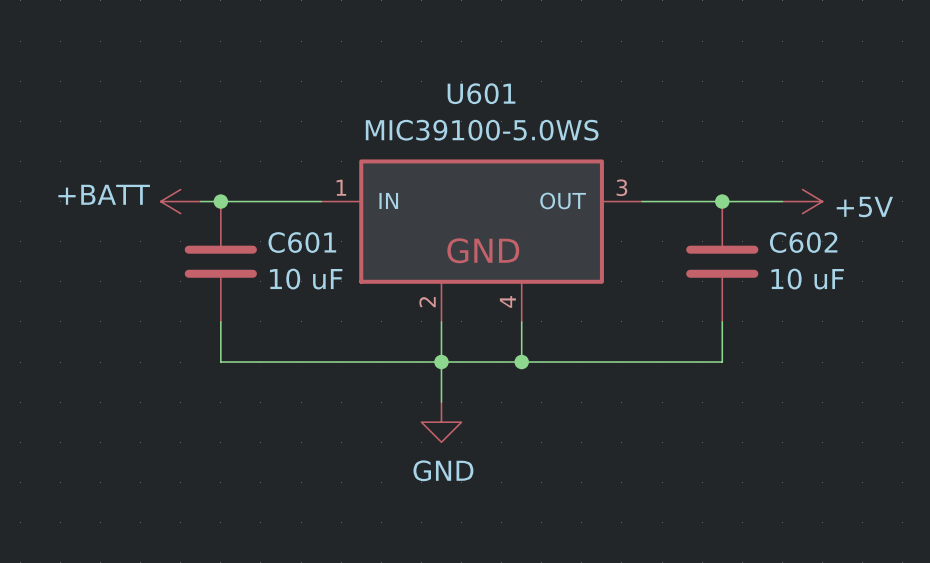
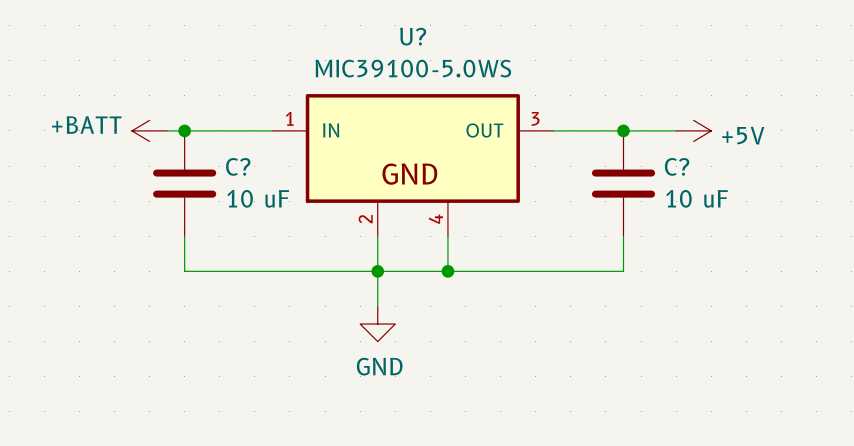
U601 name: U601 (481, 93) -> U? (413, 36)
C601 name: C601 (302, 242) -> C? (238, 166)
C602 name: C602 (803, 242) -> C? (677, 166)

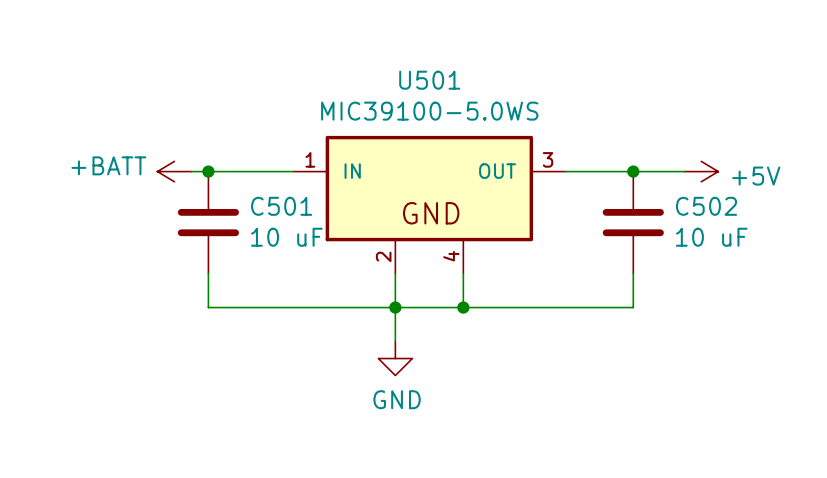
U? name: U? (413, 36) -> U501 (429, 80)
C? name: C? (238, 166) -> C501 (281, 206)
C? name: C? (677, 166) -> C502 (706, 206)

